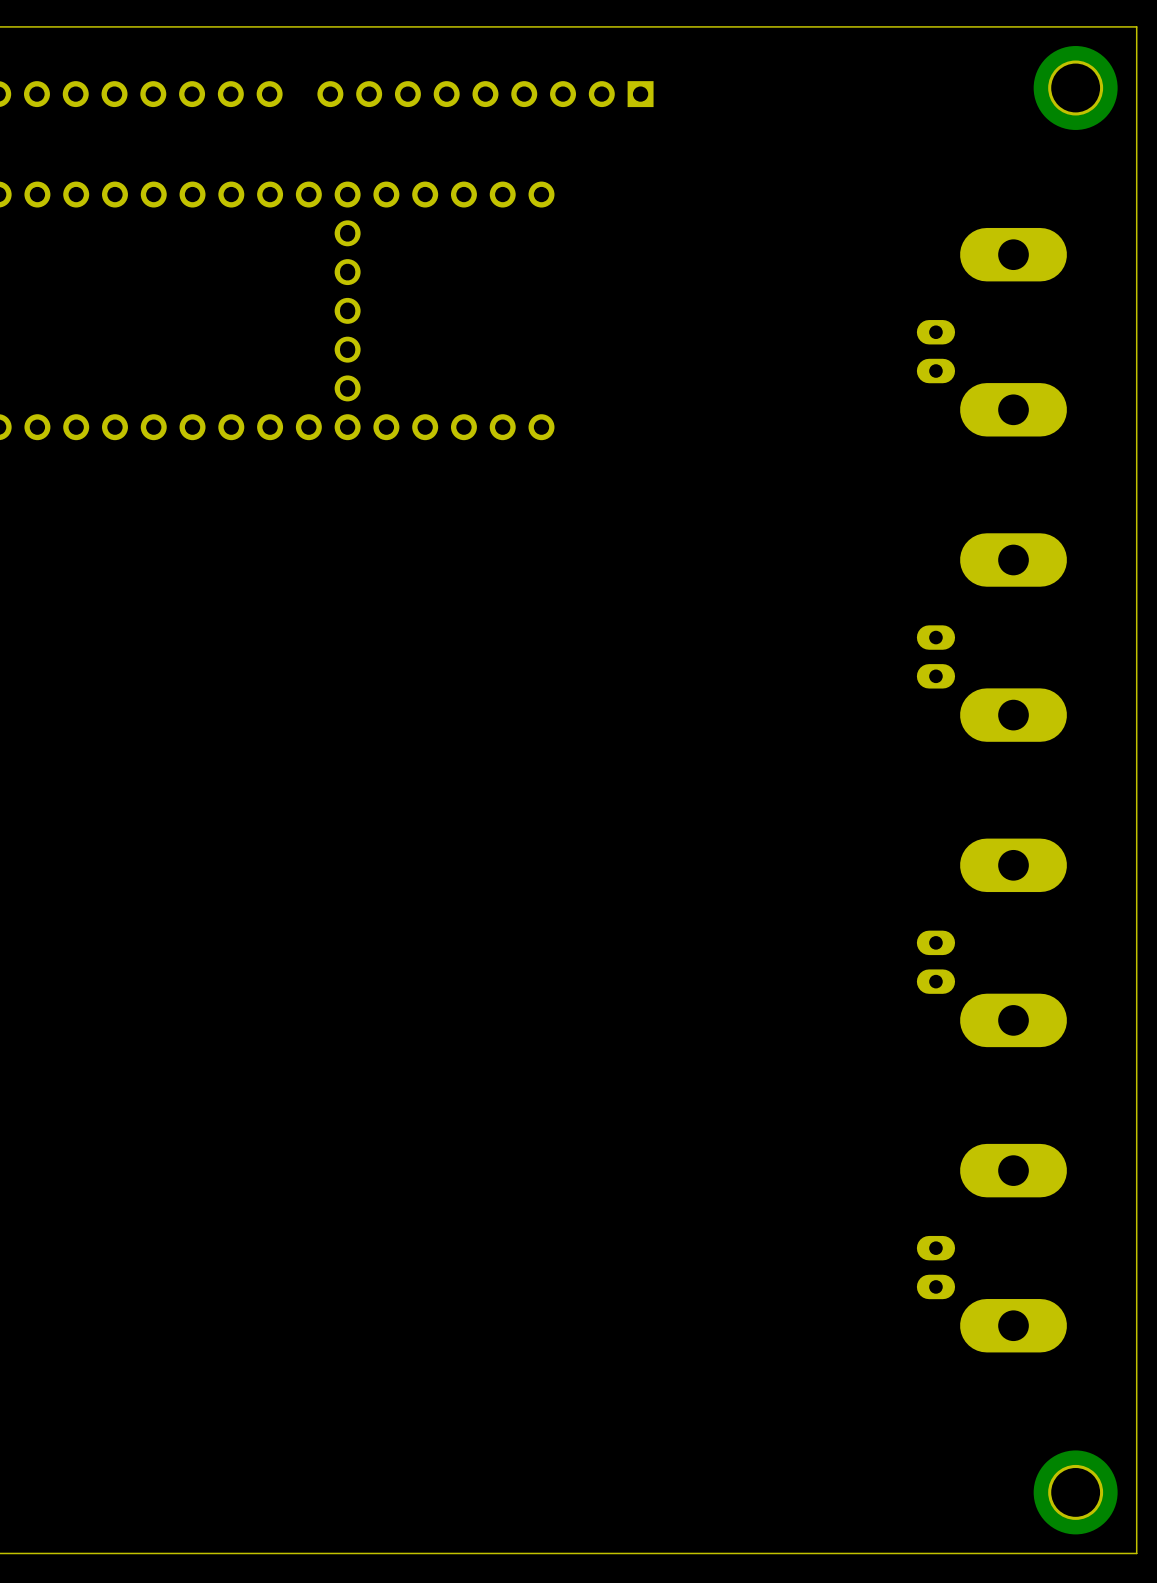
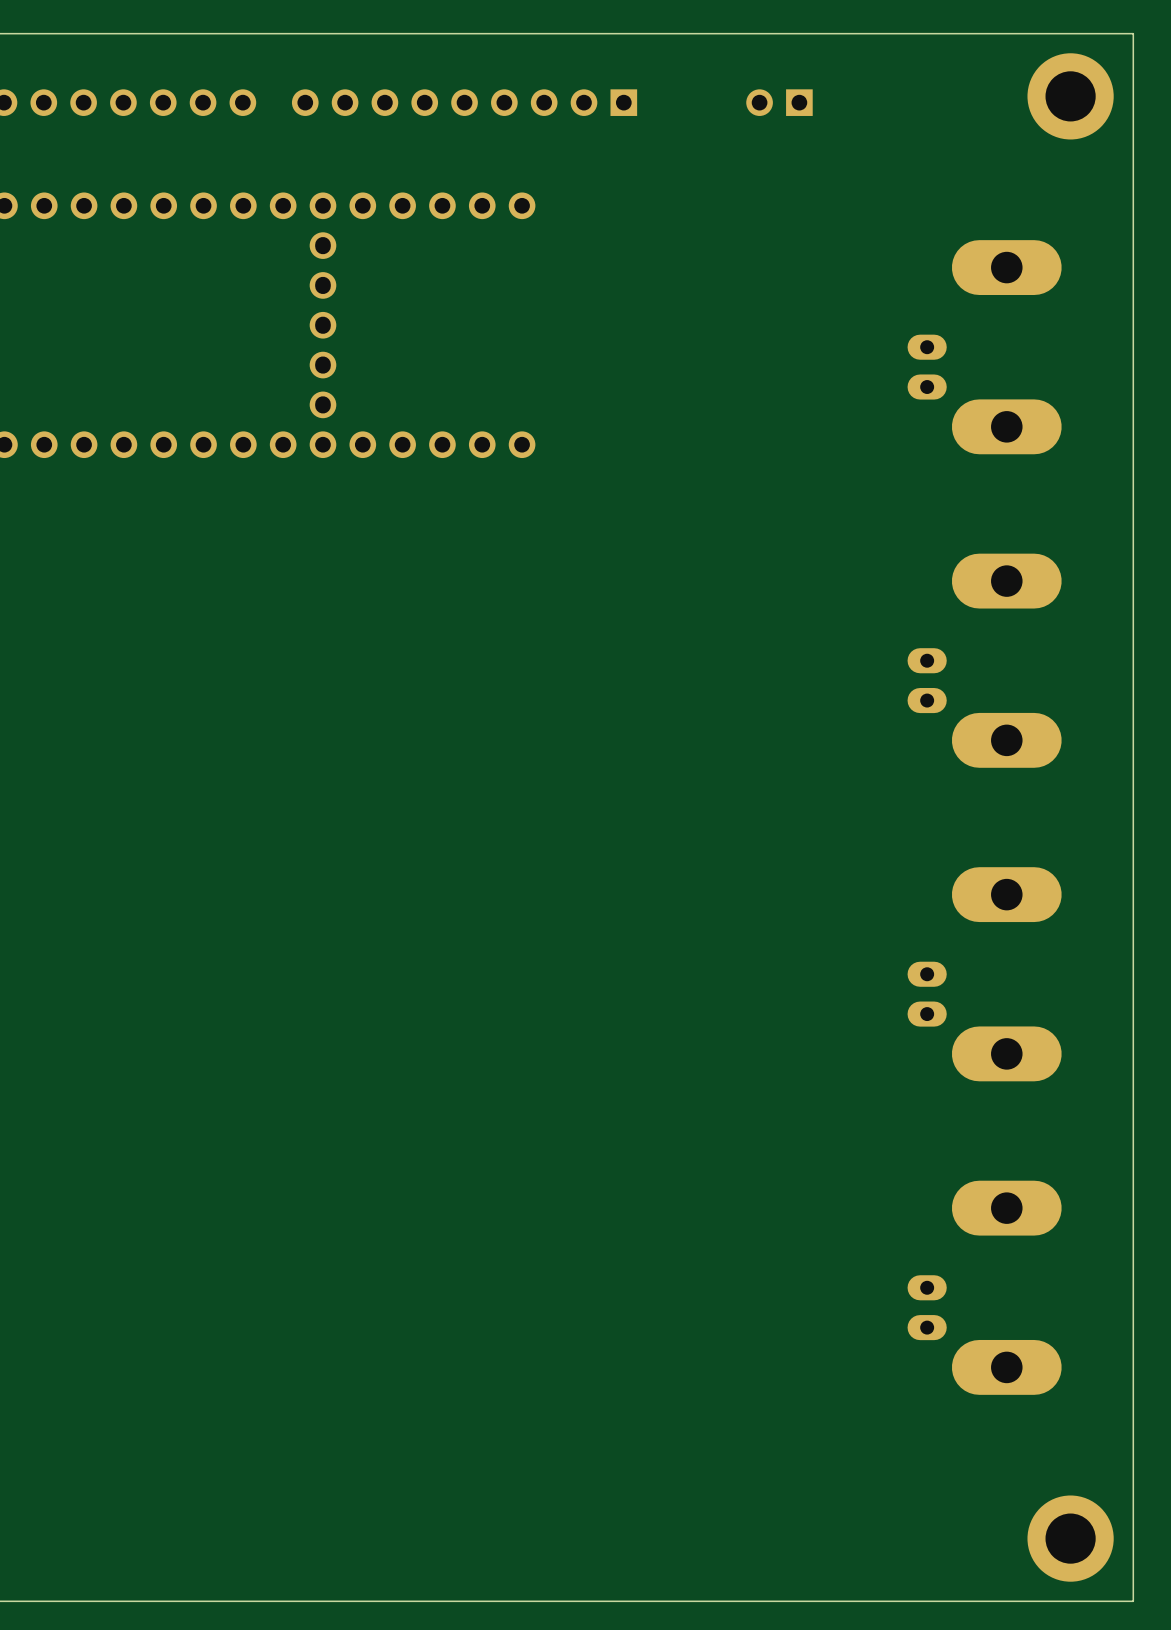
part: none -> (779, 102)

